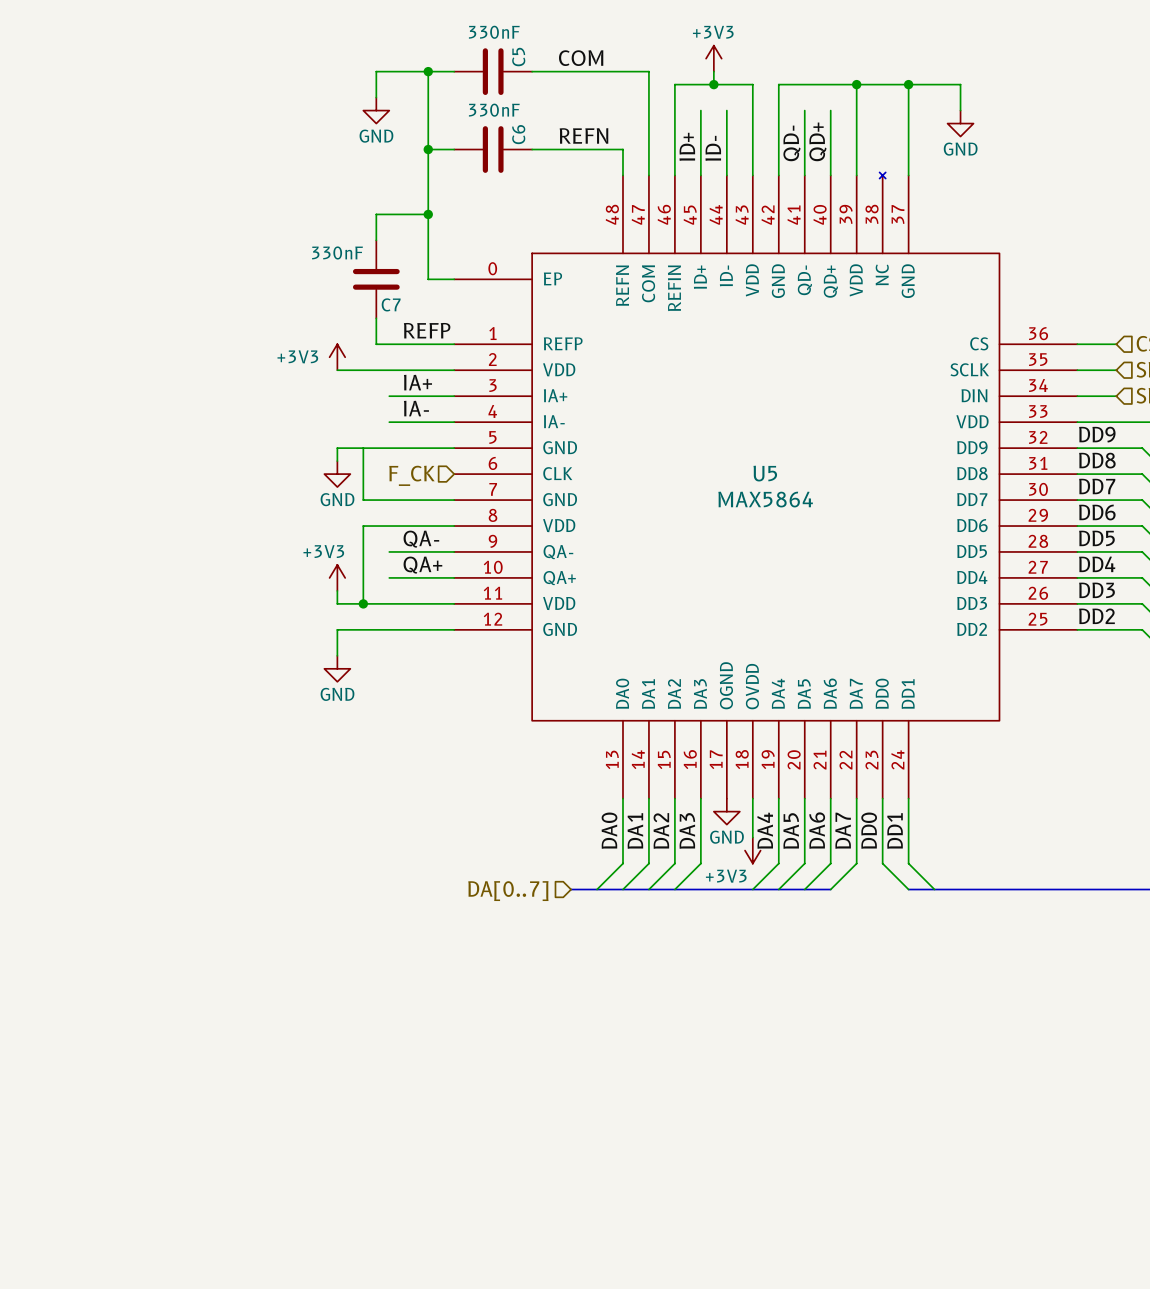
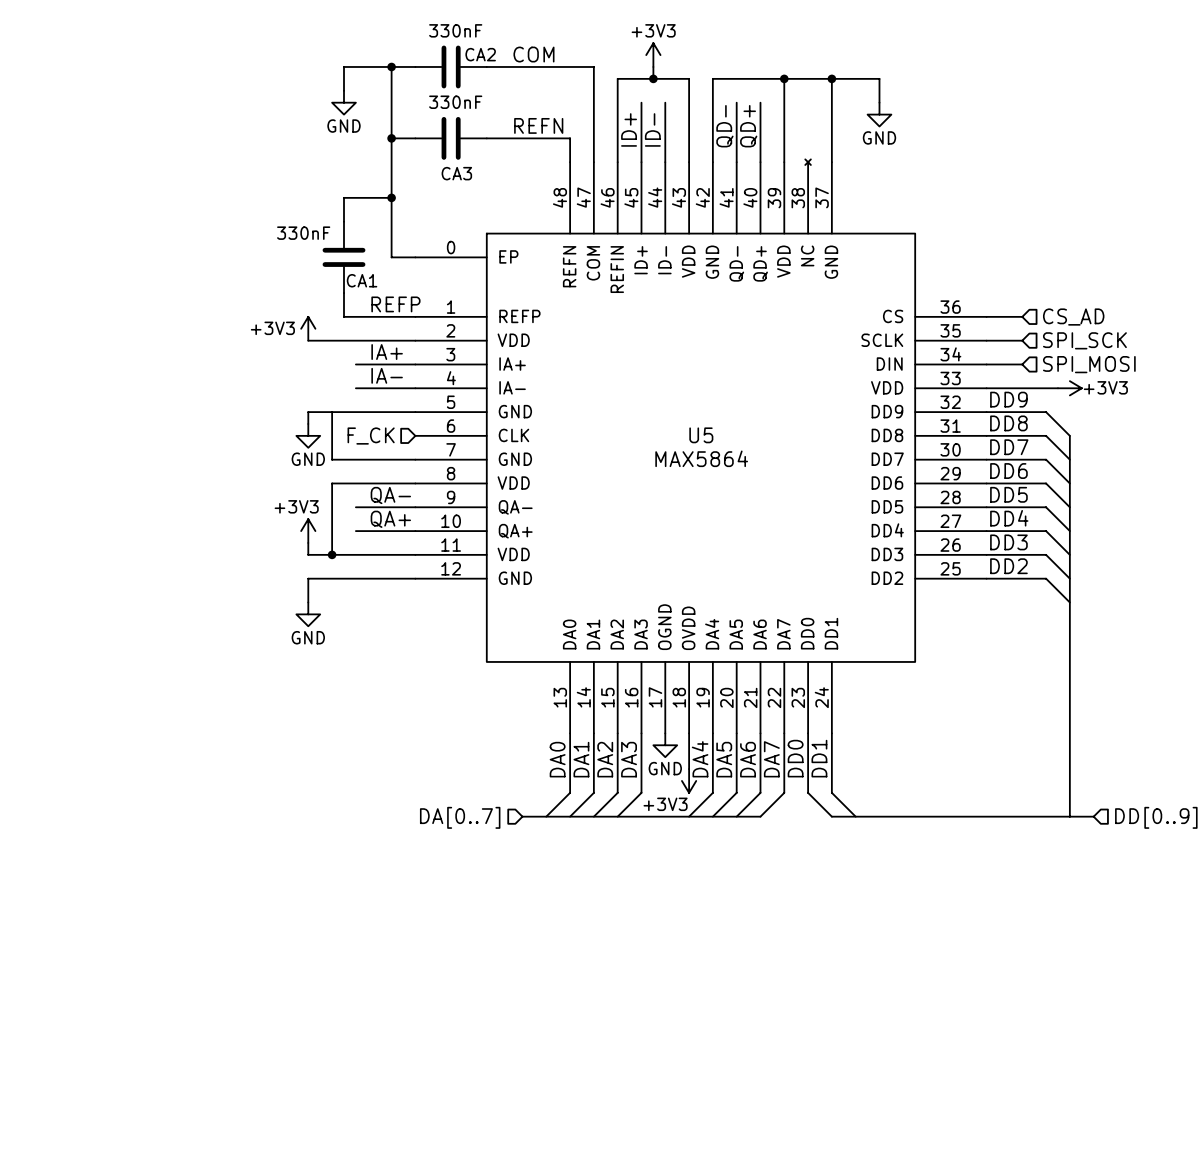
C5 name: C5 (518, 57) -> CA2 (480, 54)
C6 name: C6 (518, 134) -> CA3 (456, 173)
C7 name: C7 (391, 304) -> CA1 (362, 280)

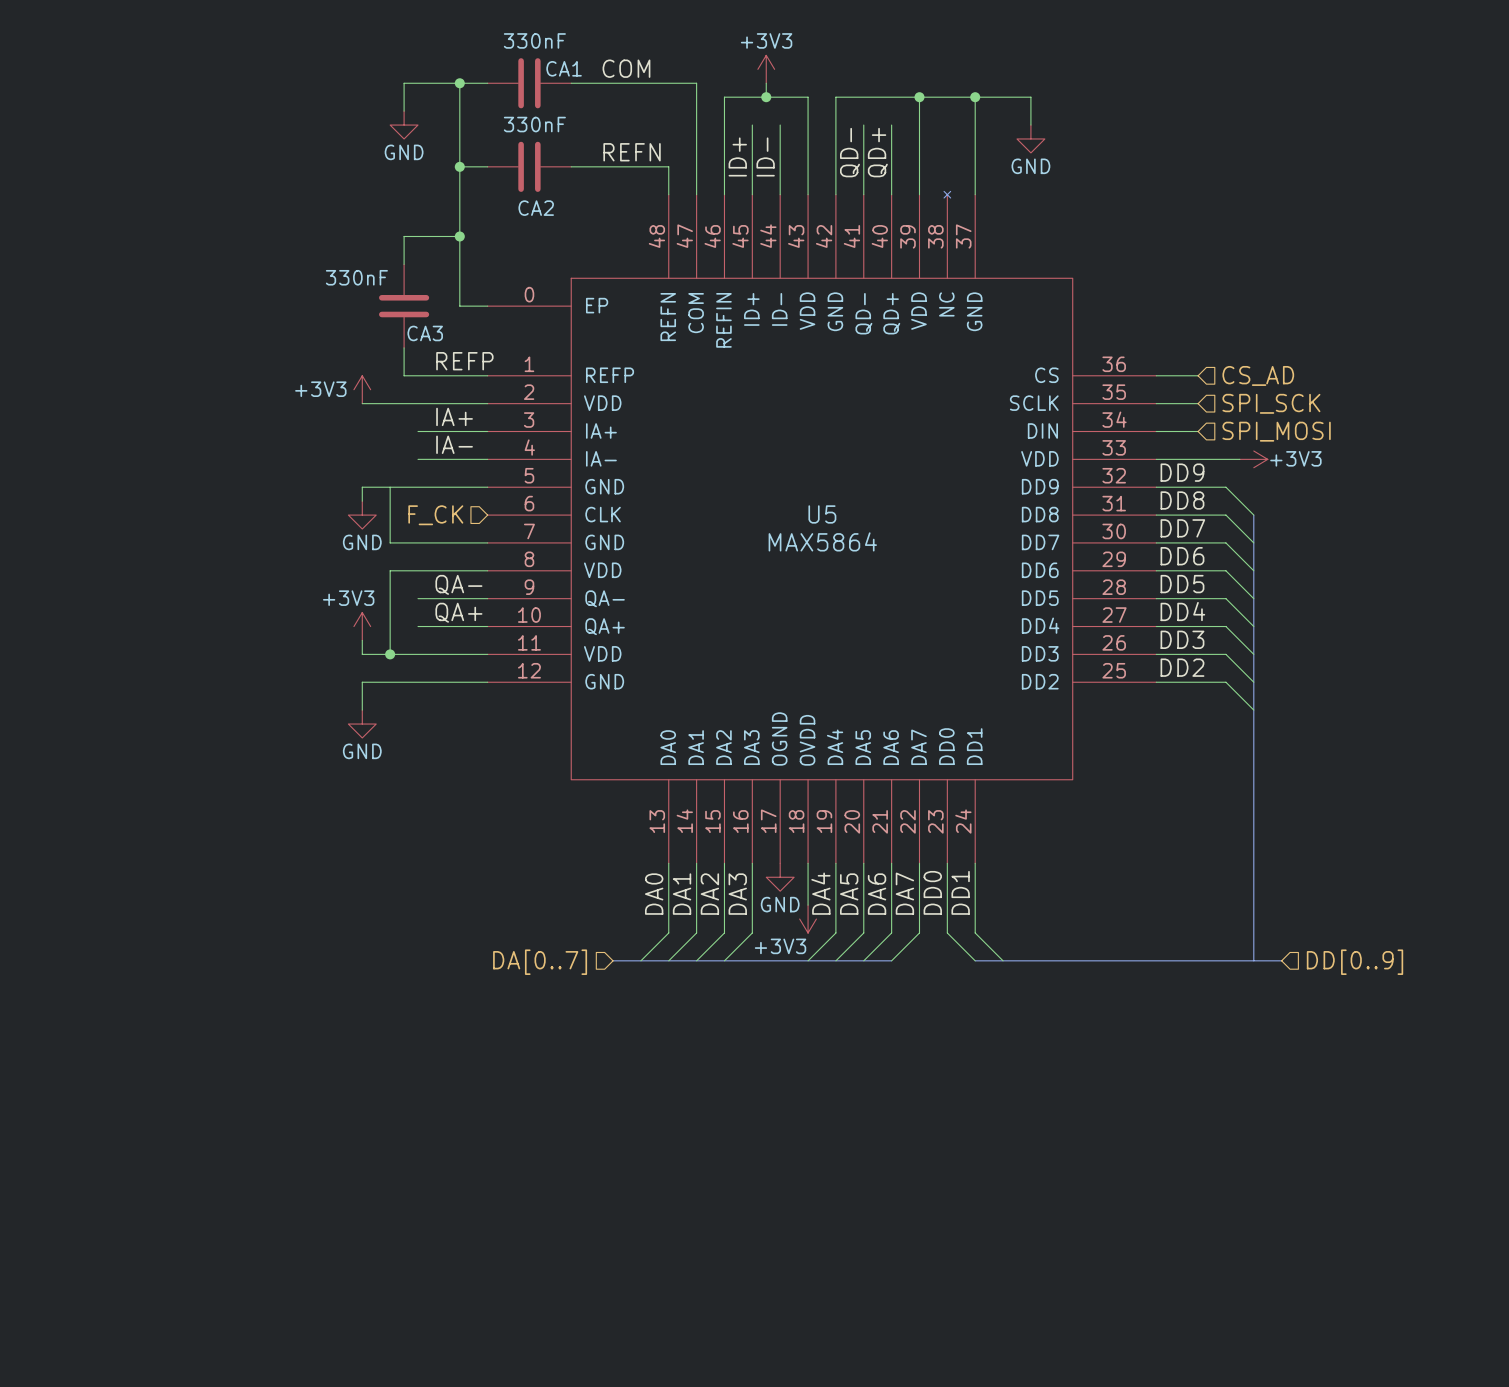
CA2 name: CA2 (480, 54) -> CA1 (564, 68)
CA3 name: CA3 (456, 173) -> CA2 (536, 208)
CA1 name: CA1 (362, 280) -> CA3 (425, 333)

